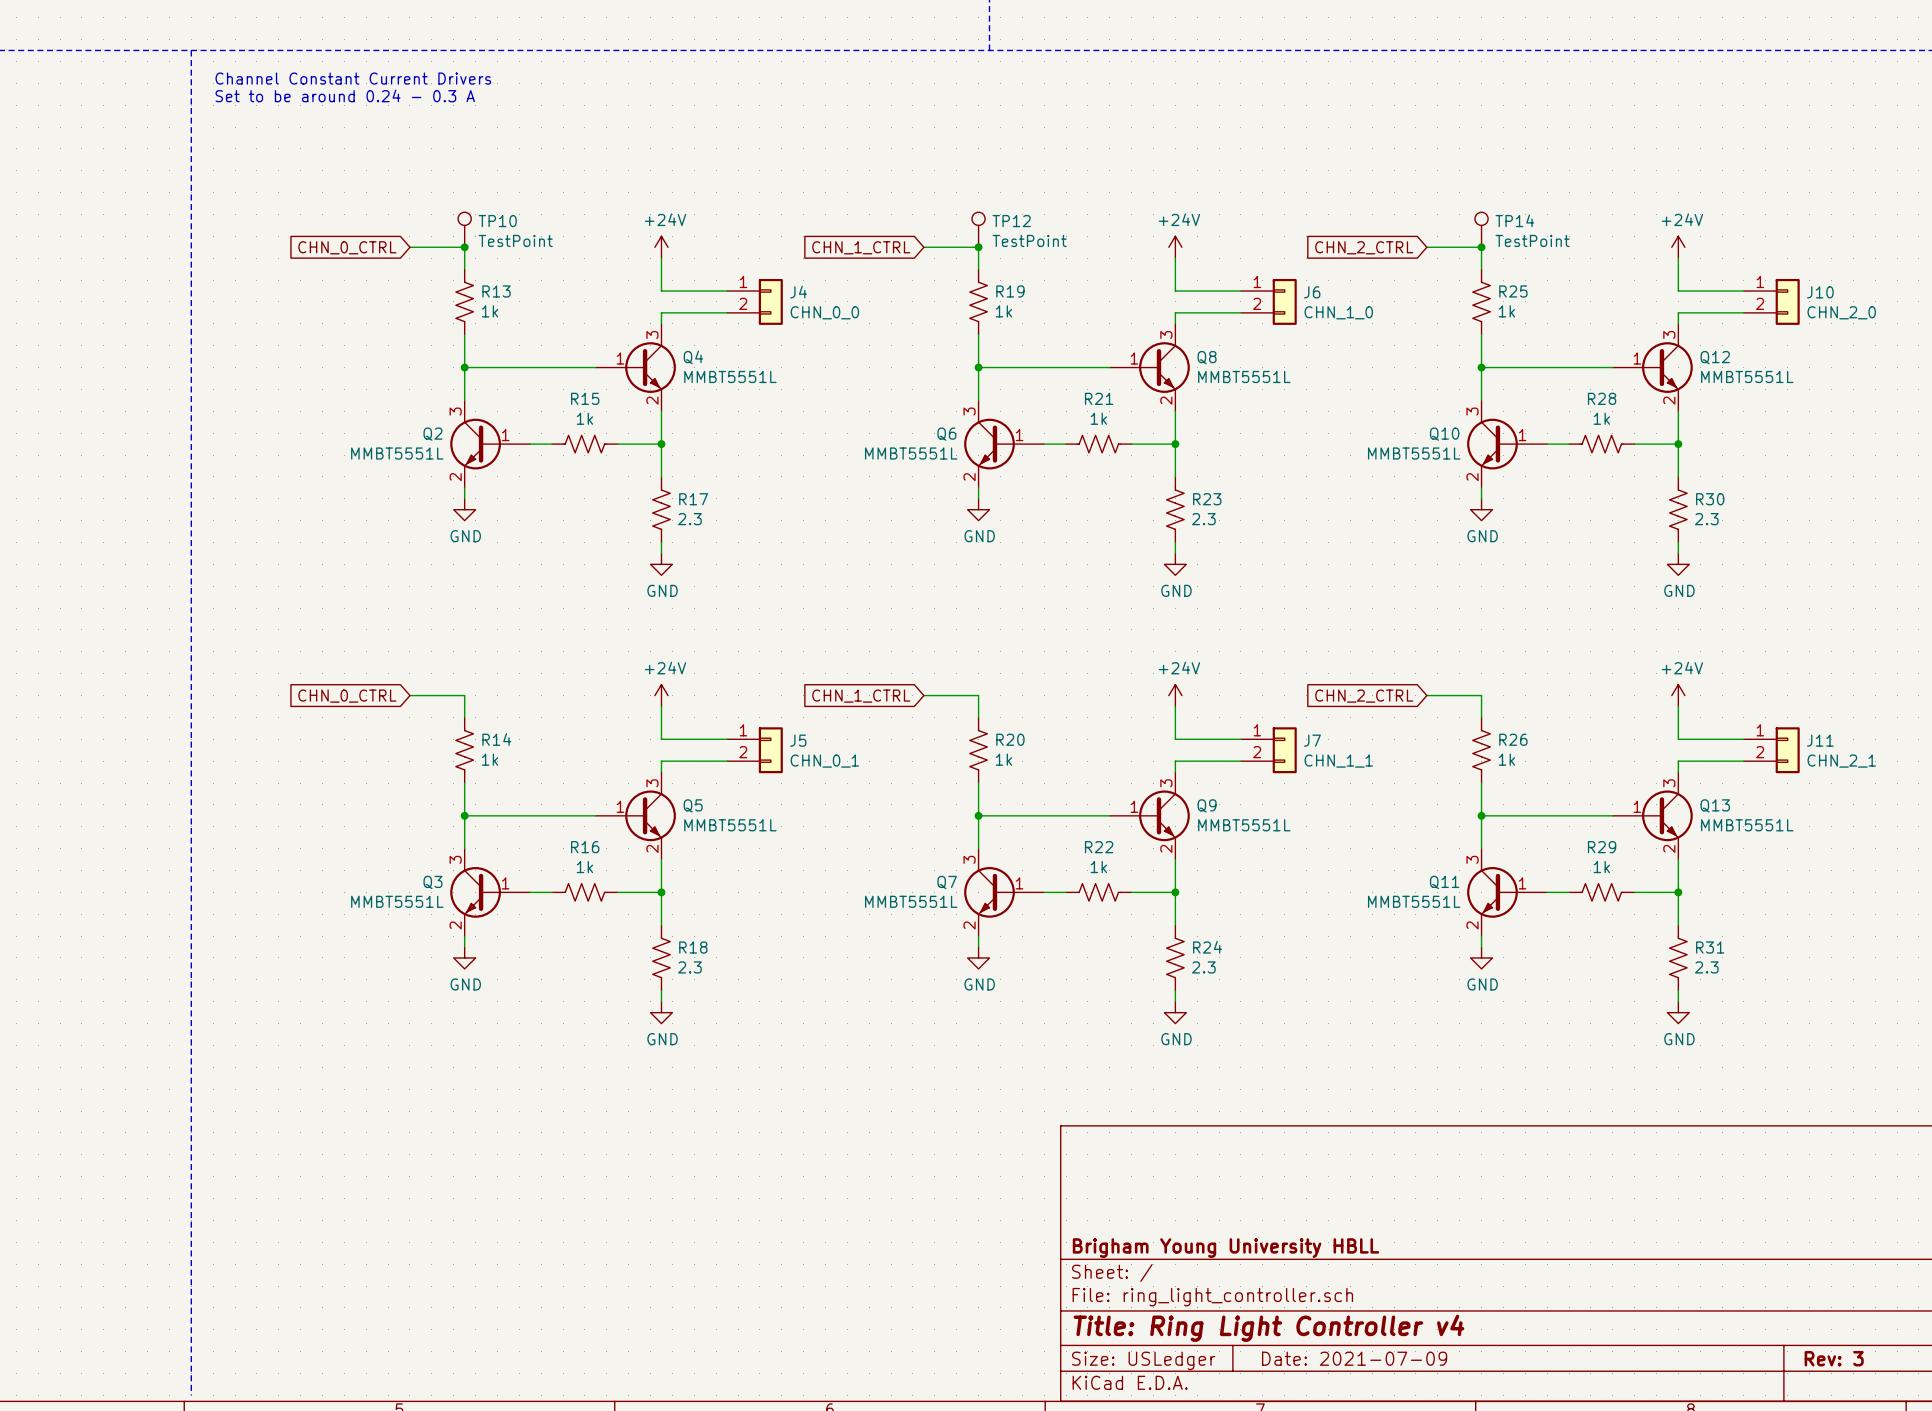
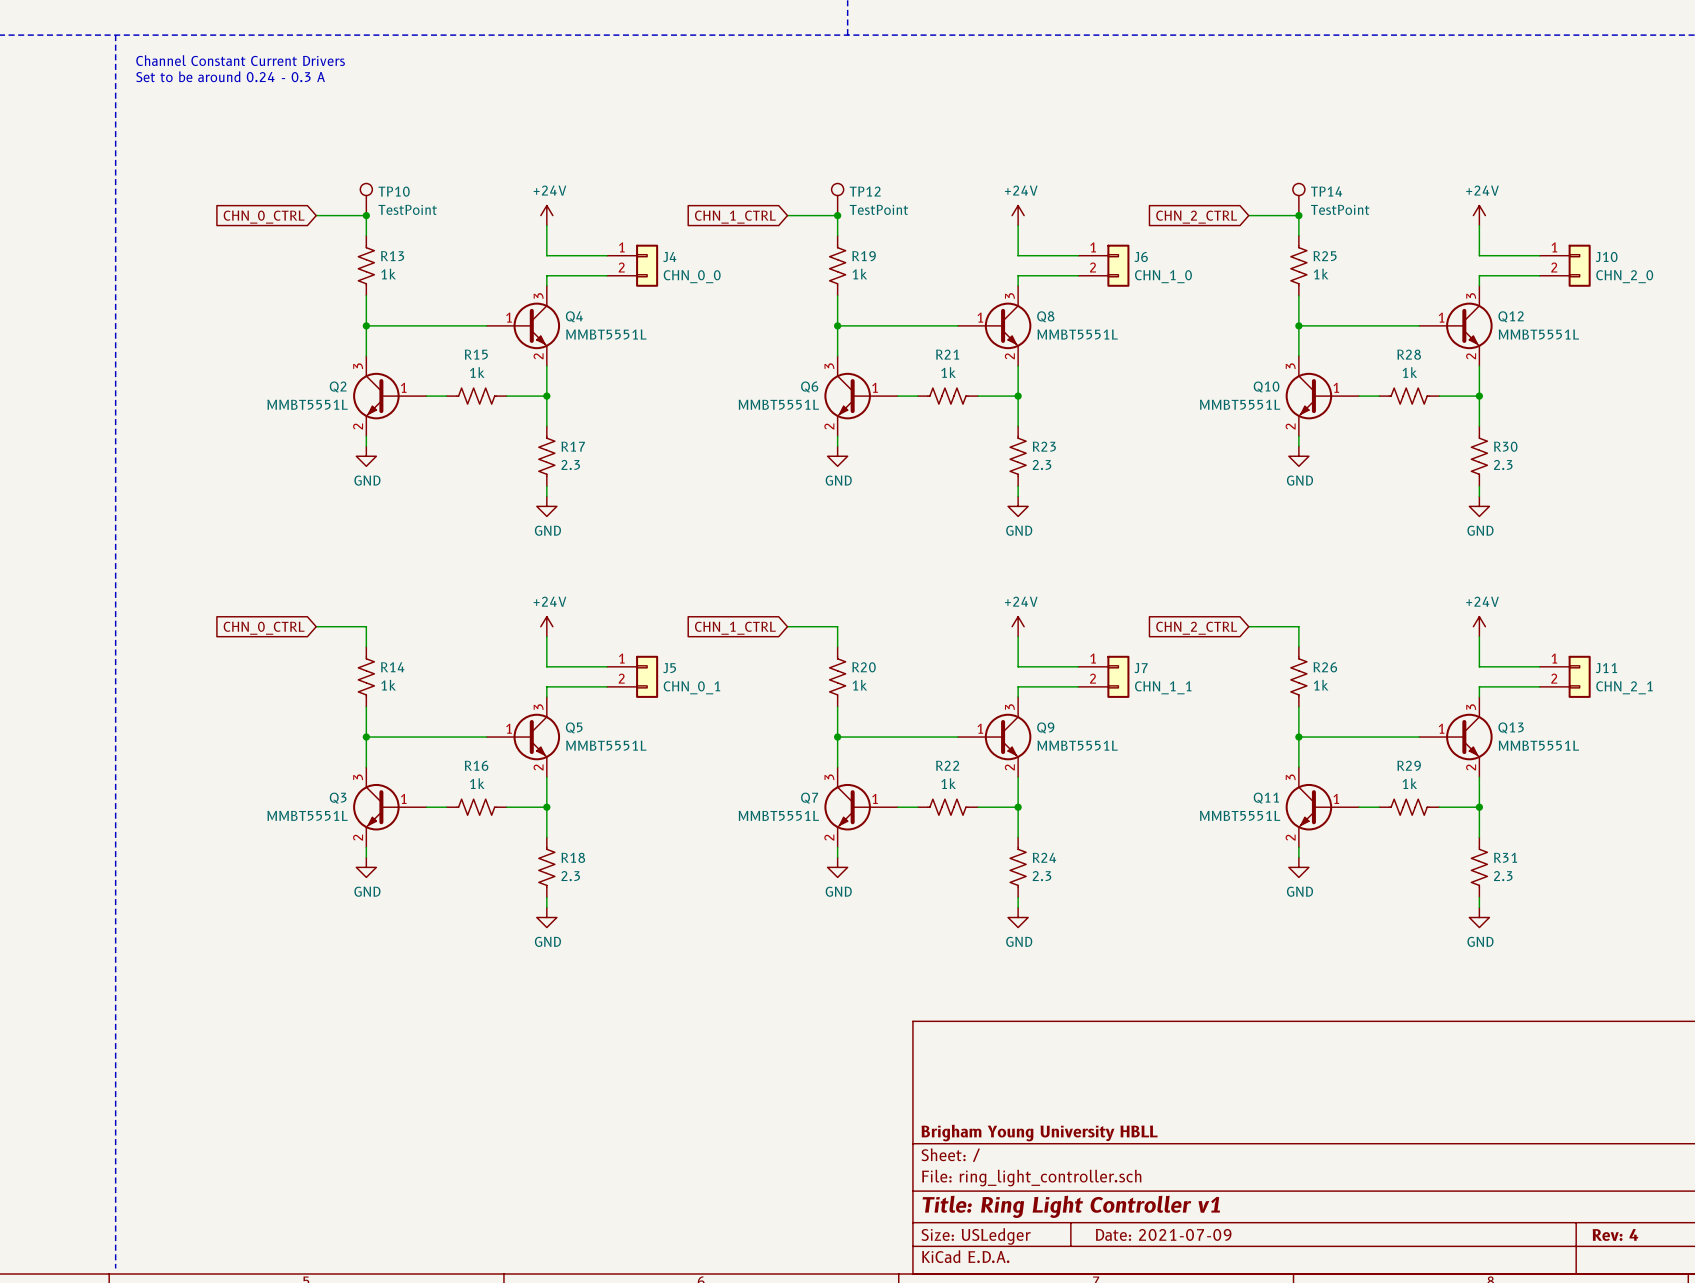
title block: Title: Ring Light Controller v4 (1268, 1328) -> Title: Ring Light Controller v1 (1071, 1206)
title block: Rev: 3 (1834, 1358) -> Rev: 4 (1615, 1234)

